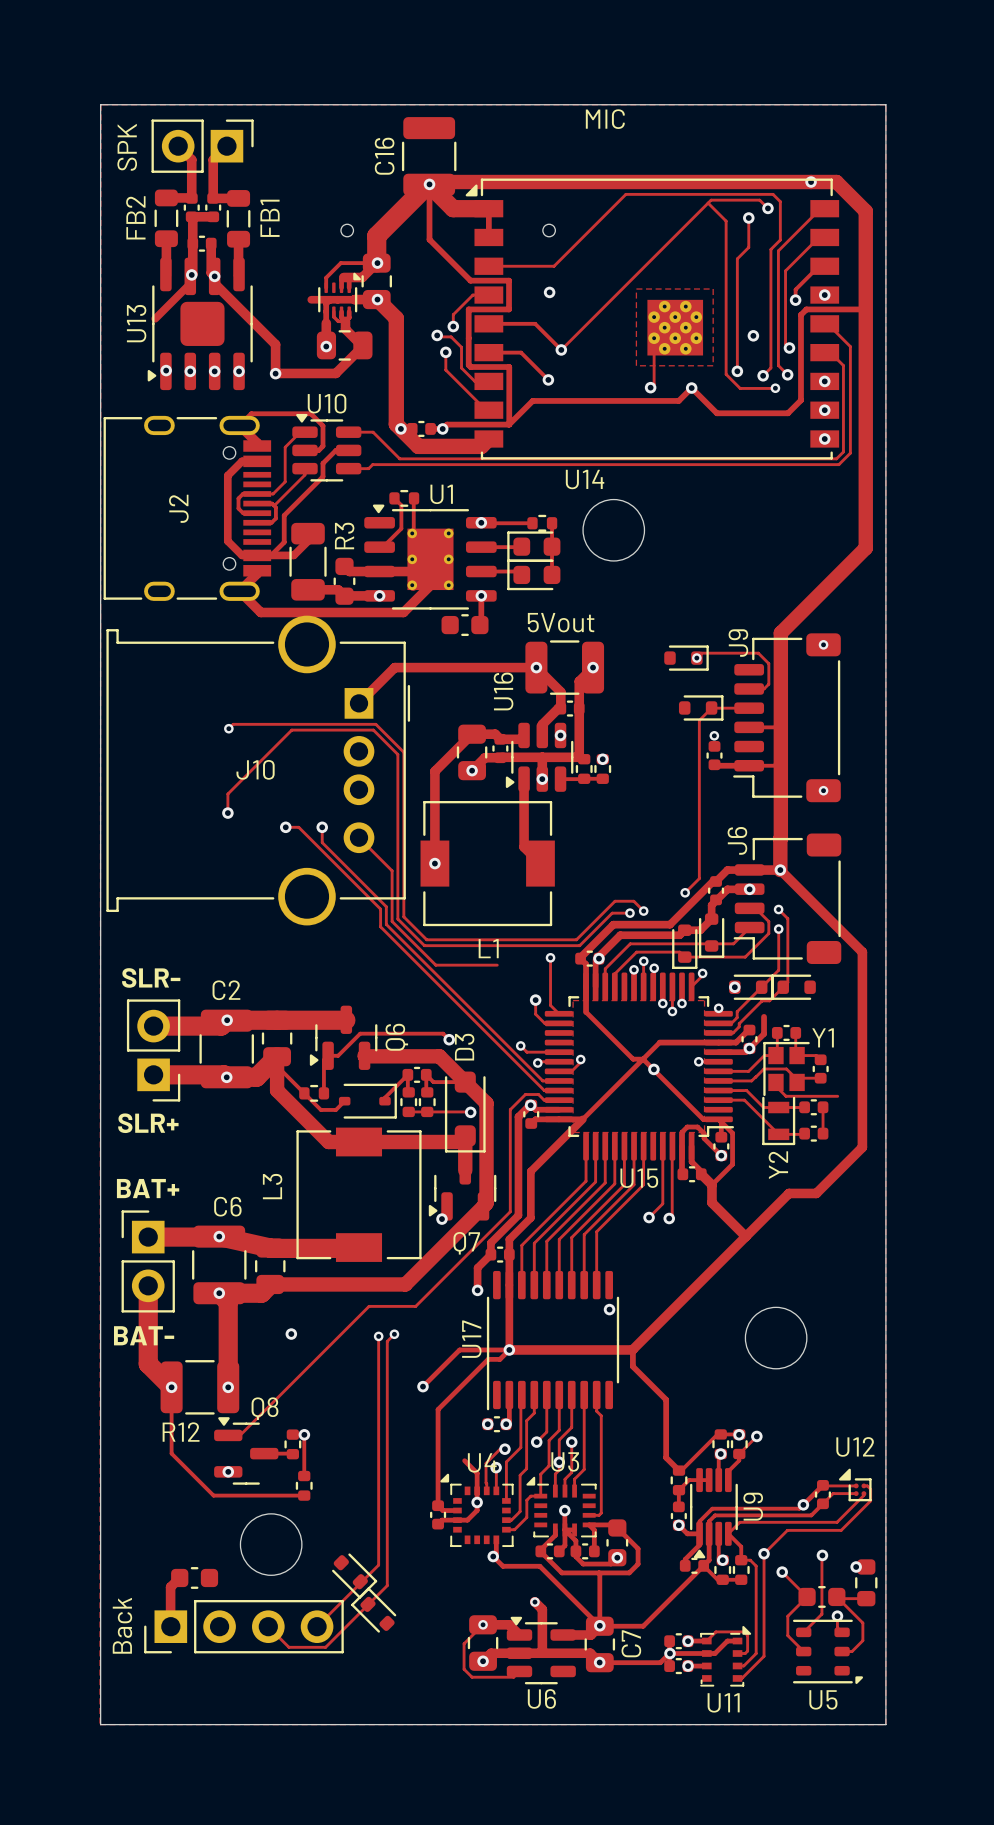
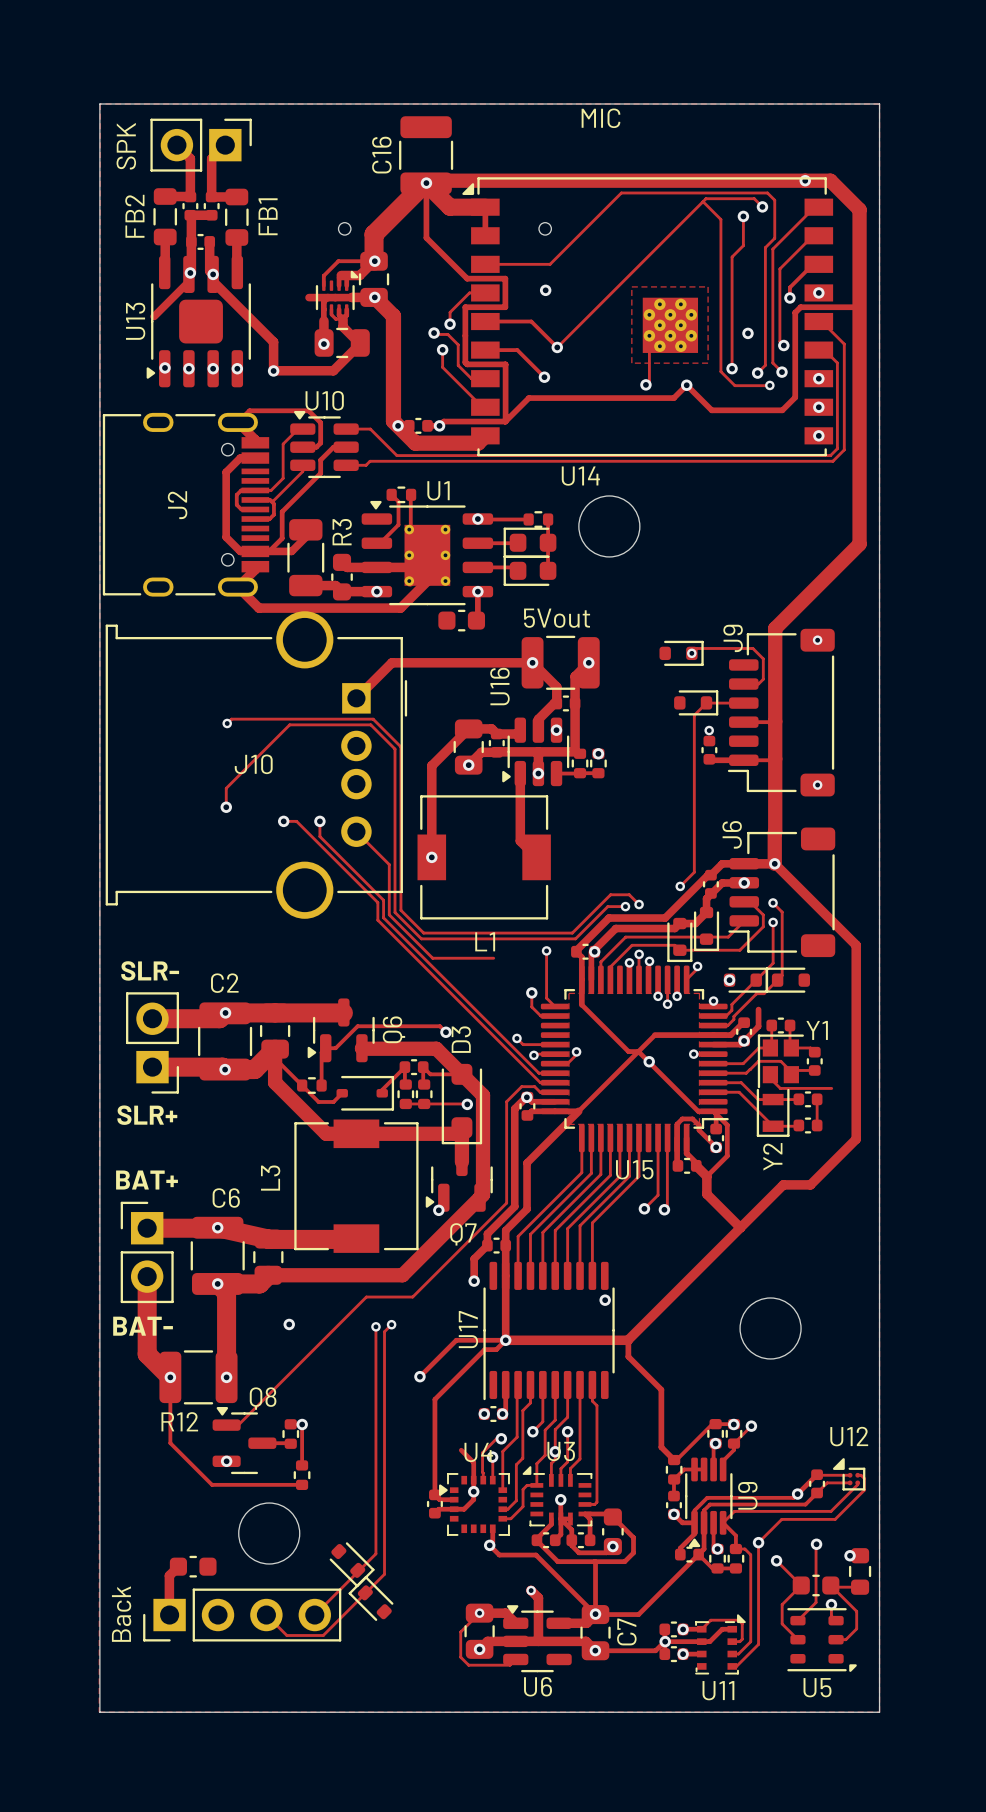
U4 footprint: [440, 1473, 514, 1548] -> [439, 1473, 510, 1536]

